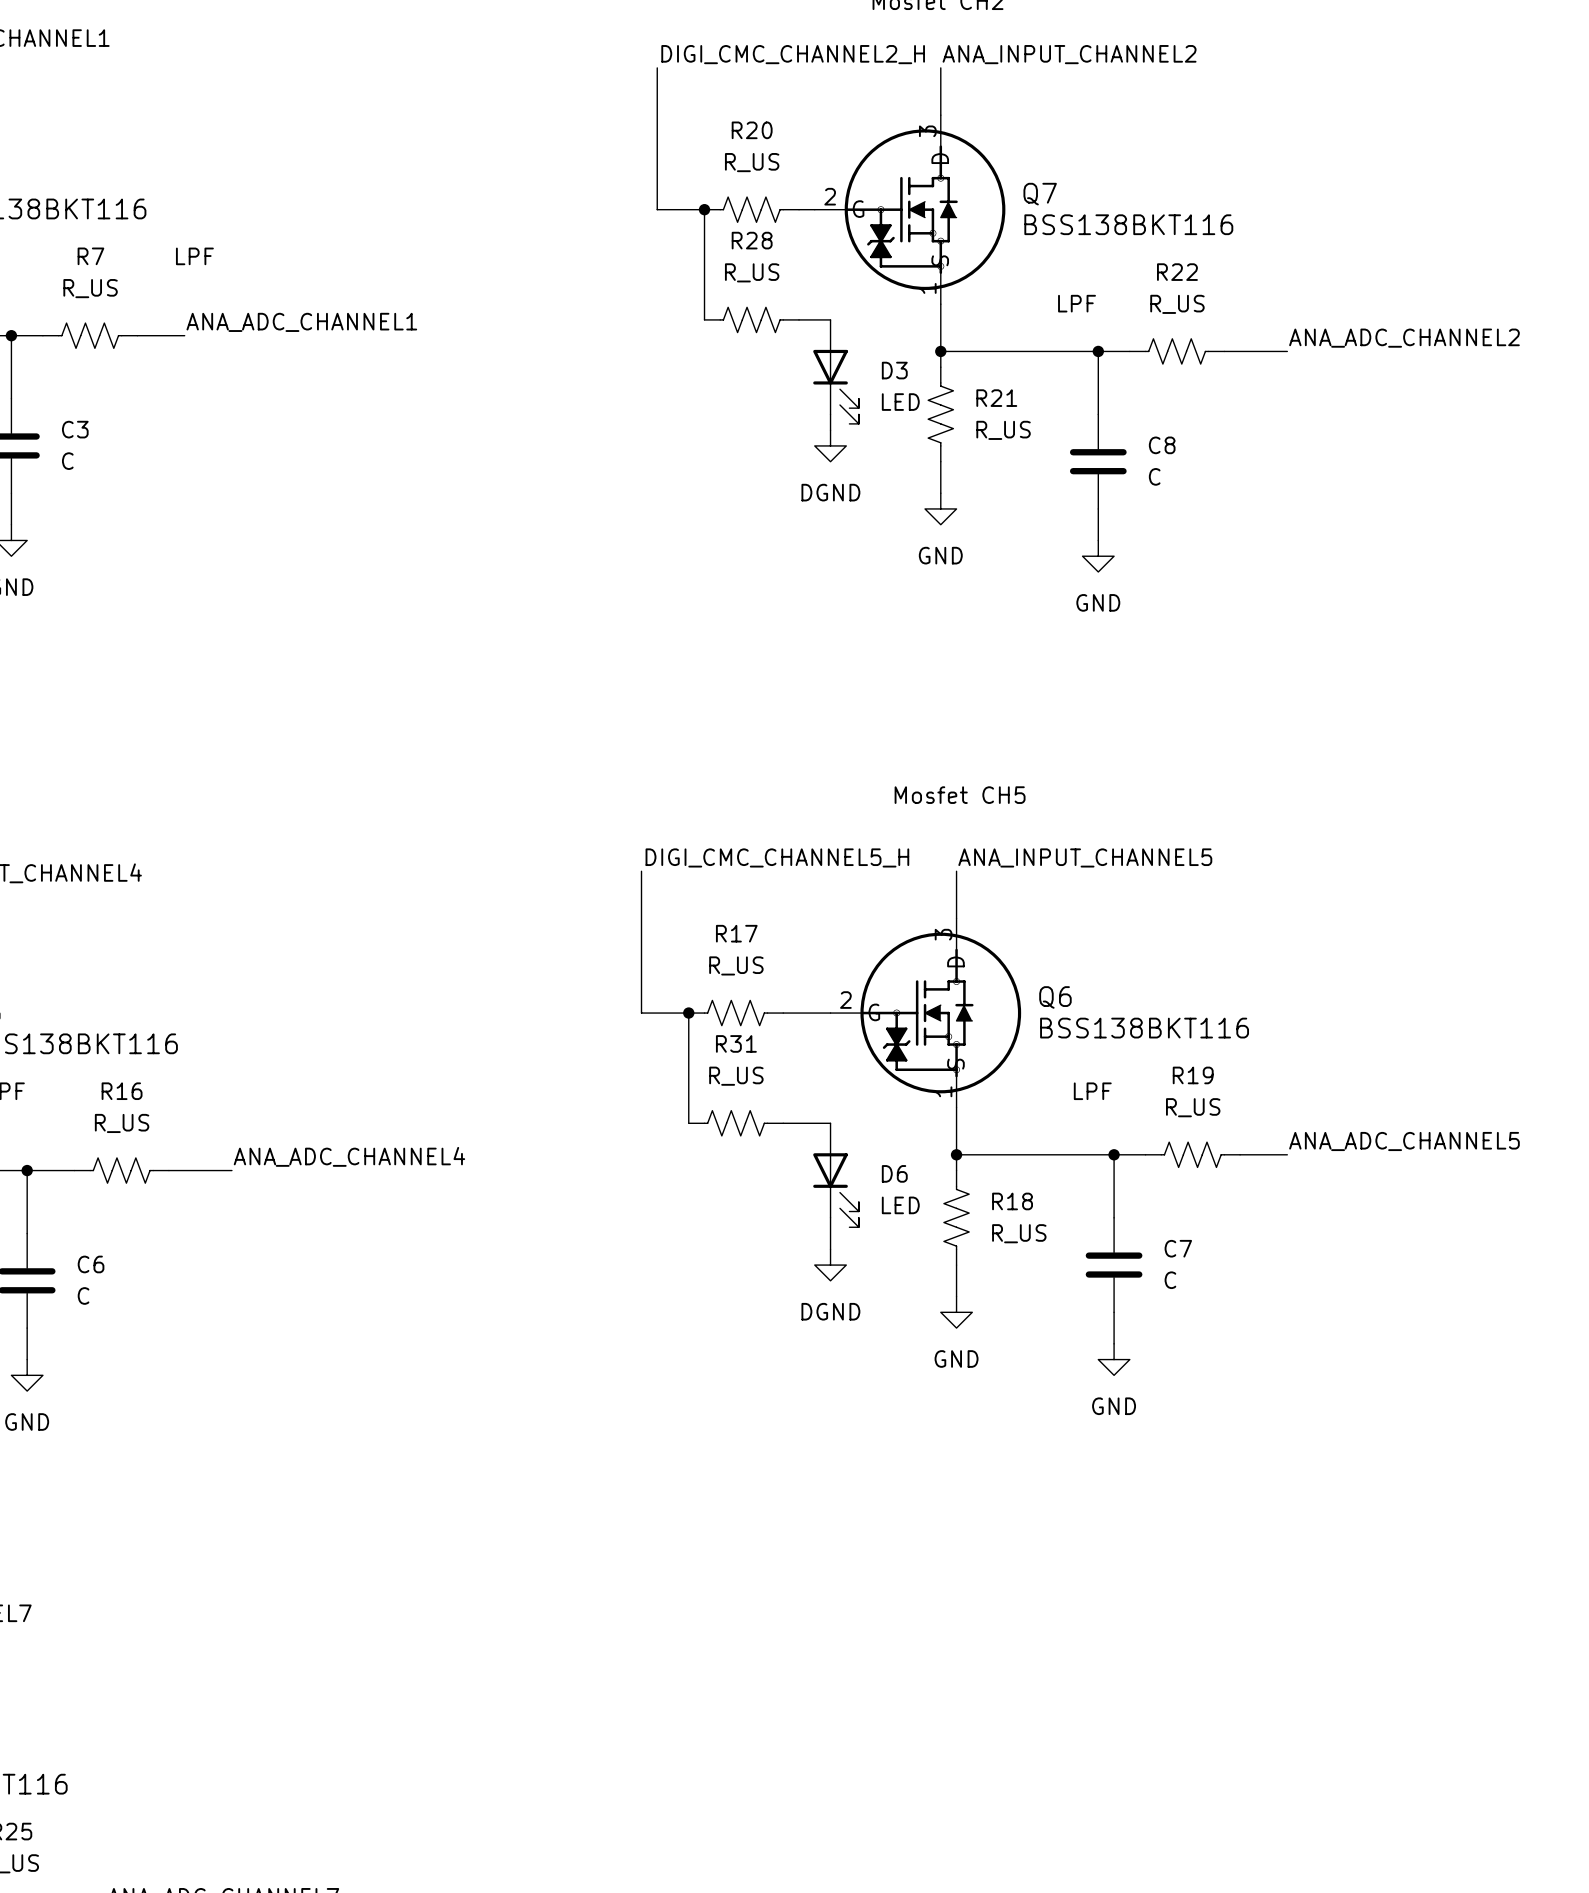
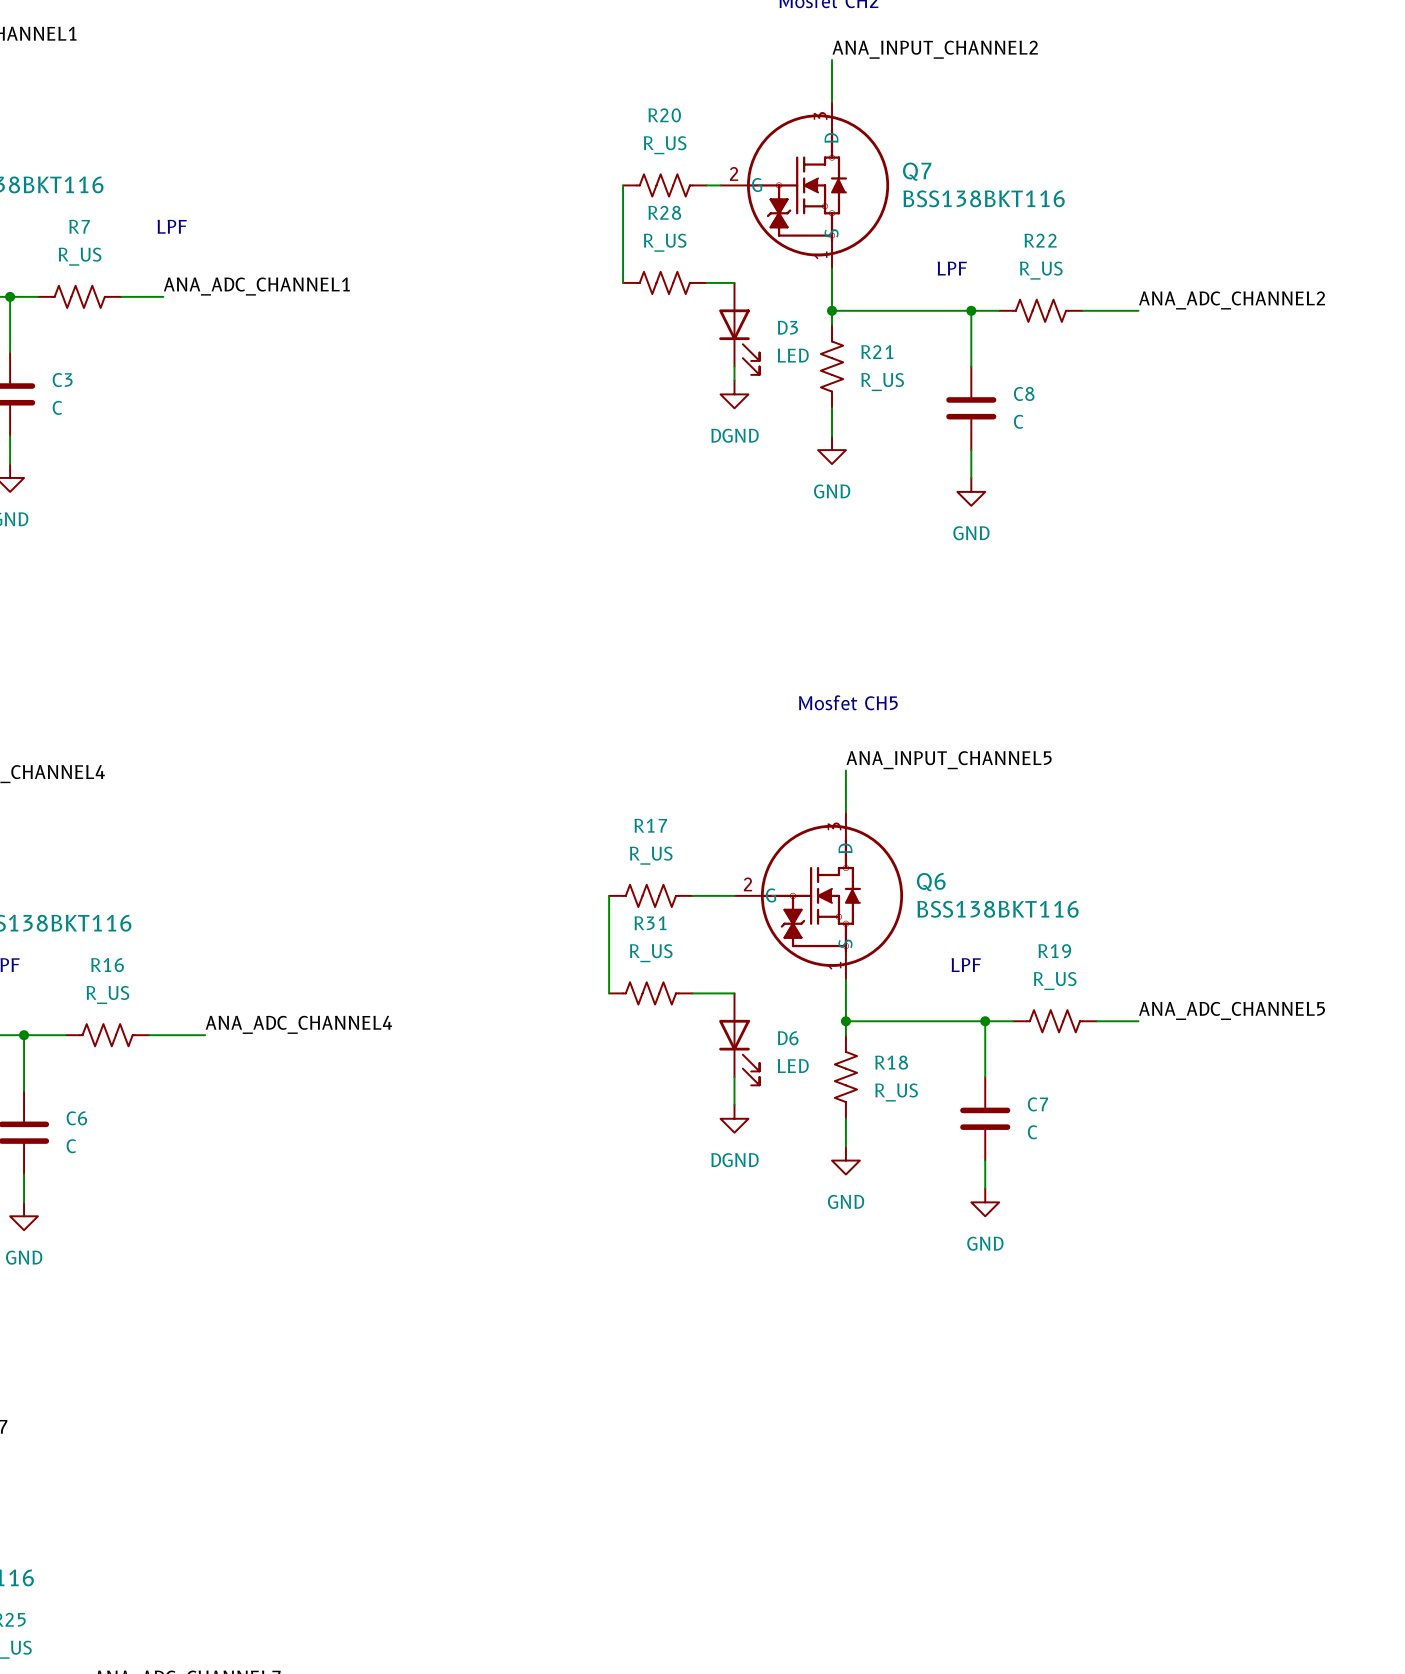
label: DIGI_CMC_CHANNEL2_H (793, 54) -> none
wire: (657, 67) (657, 209) (704, 209) -> none
junction: (704, 209) -> none
label: DIGI_CMC_CHANNEL5_H (777, 857) -> none
wire: (641, 871) (641, 1013) (688, 1013) -> none
junction: (688, 1013) -> none

